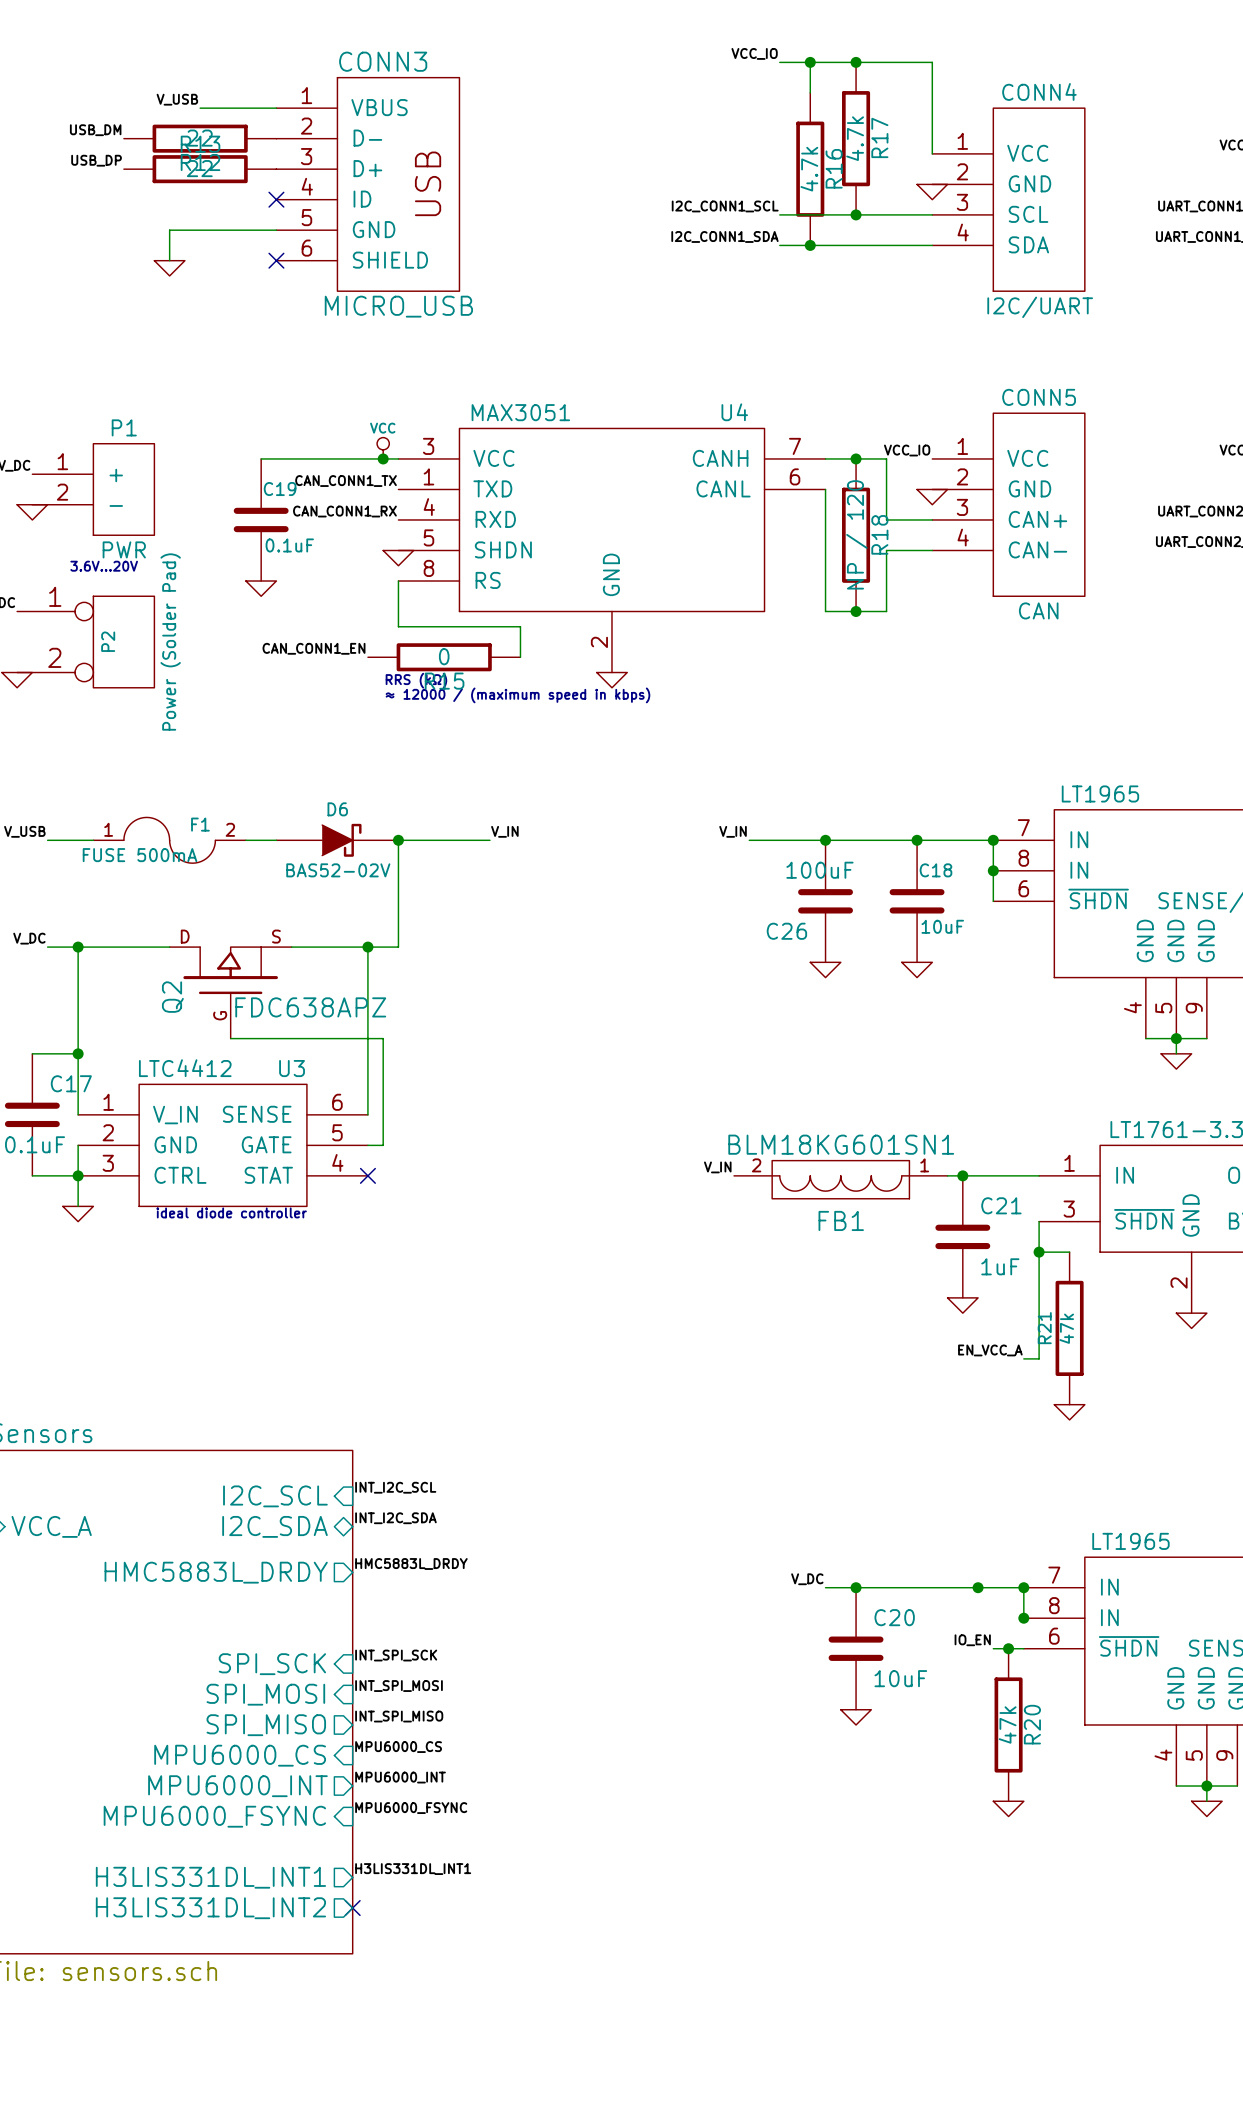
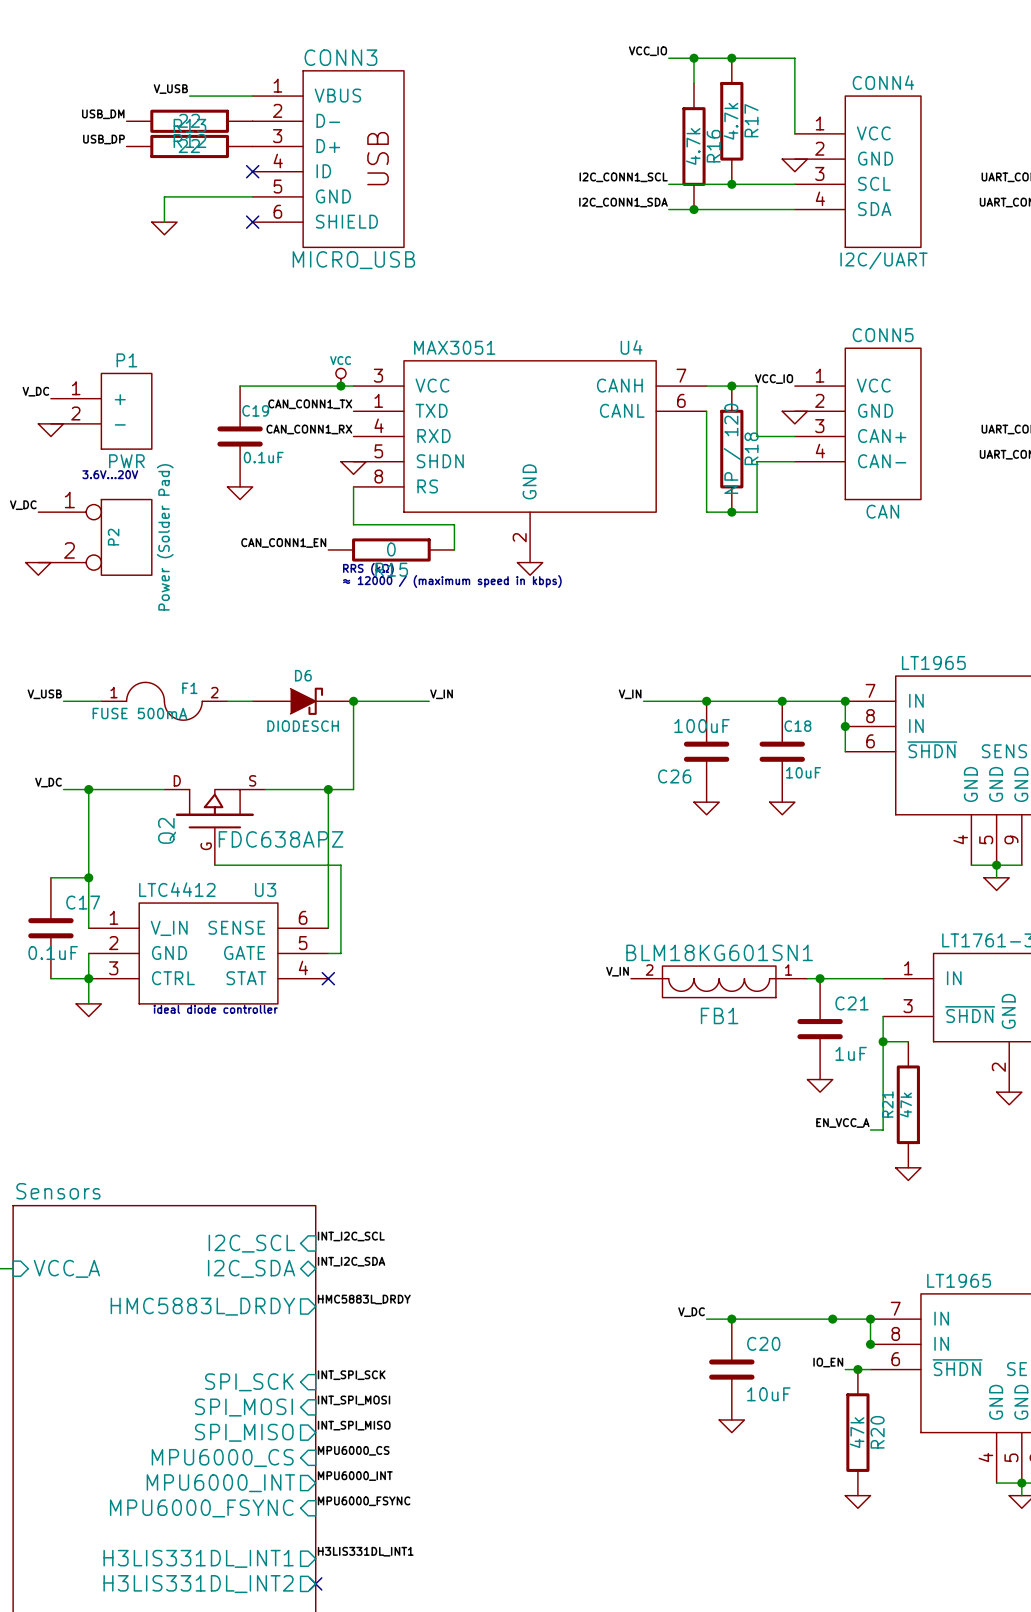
D6 value: BAS52-02V (338, 870) -> DIODESCH (303, 726)

